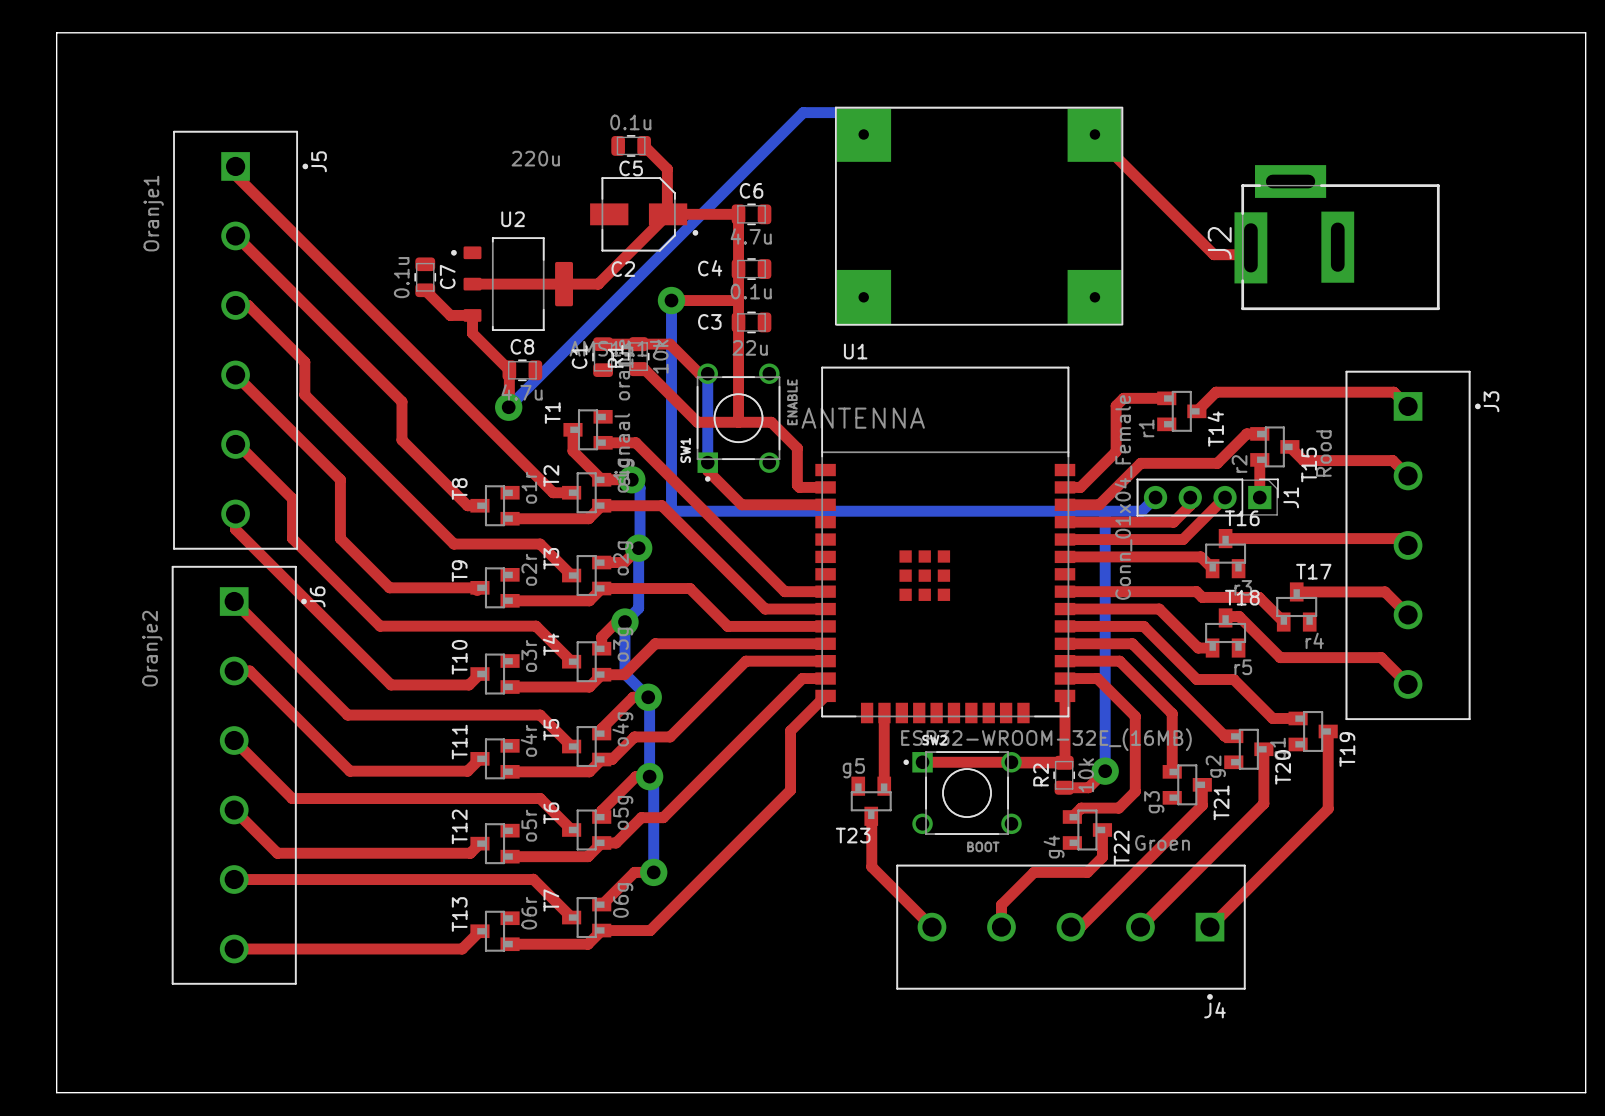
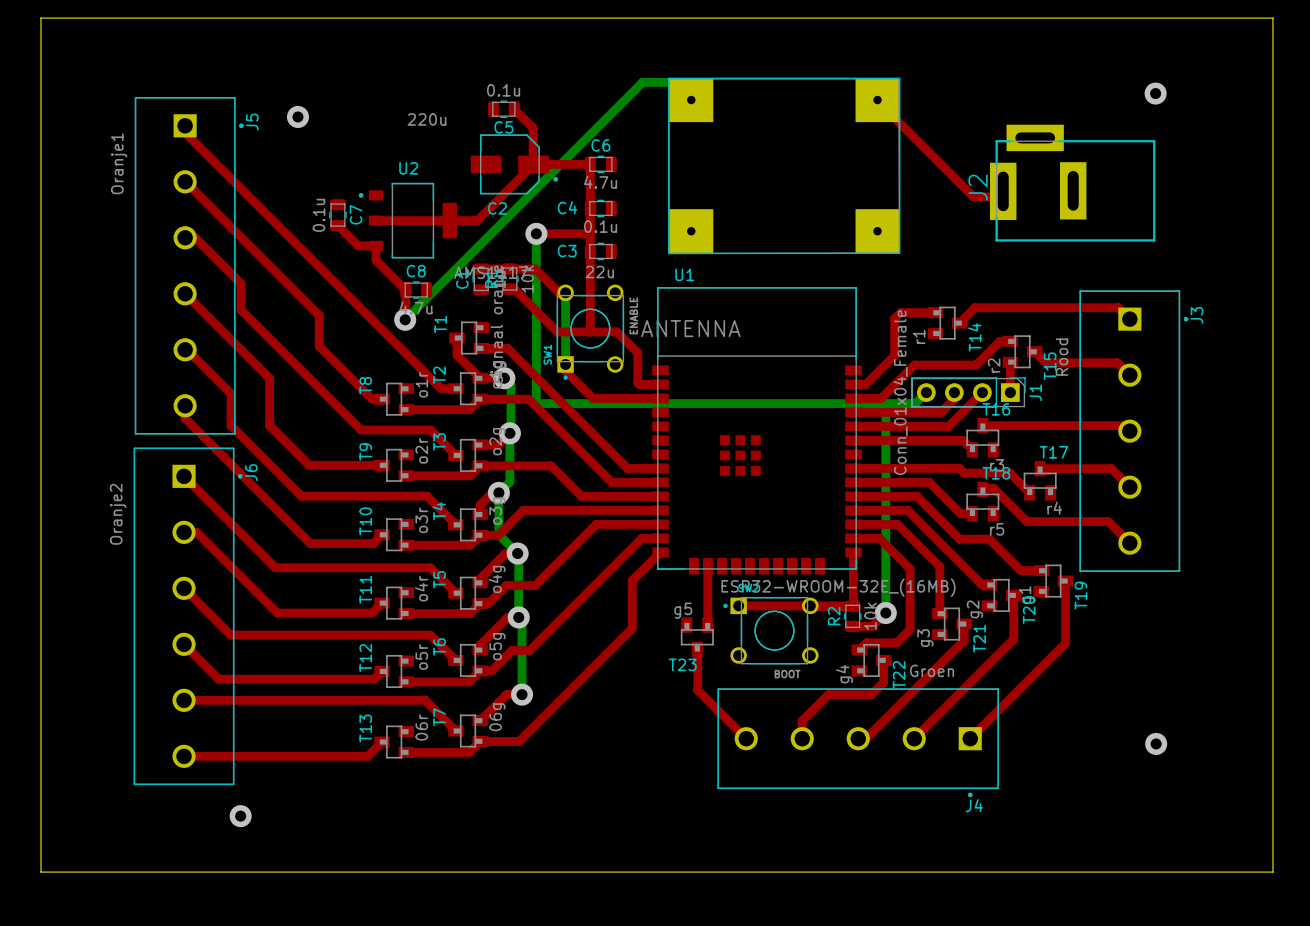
via: none -> (1155, 93)
via: none -> (297, 116)
via: none -> (1156, 743)
via: none -> (240, 816)

